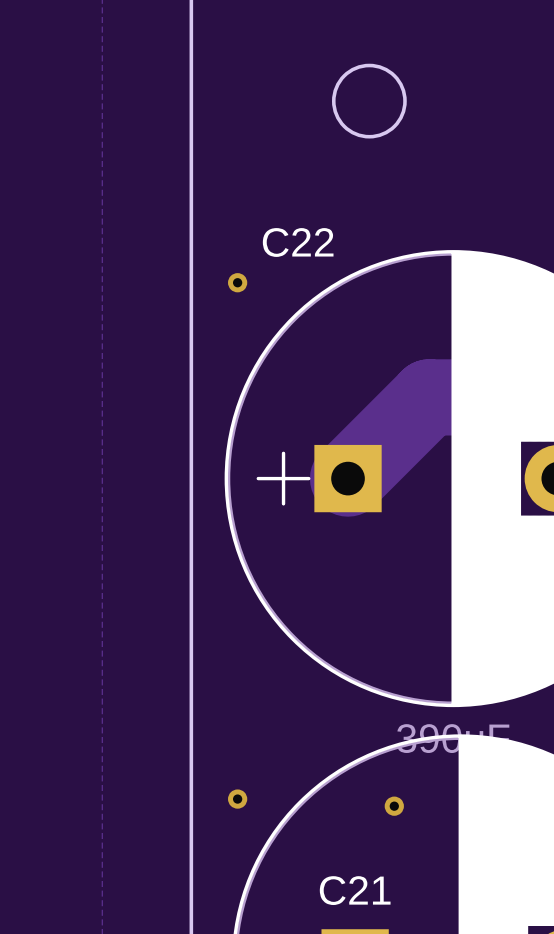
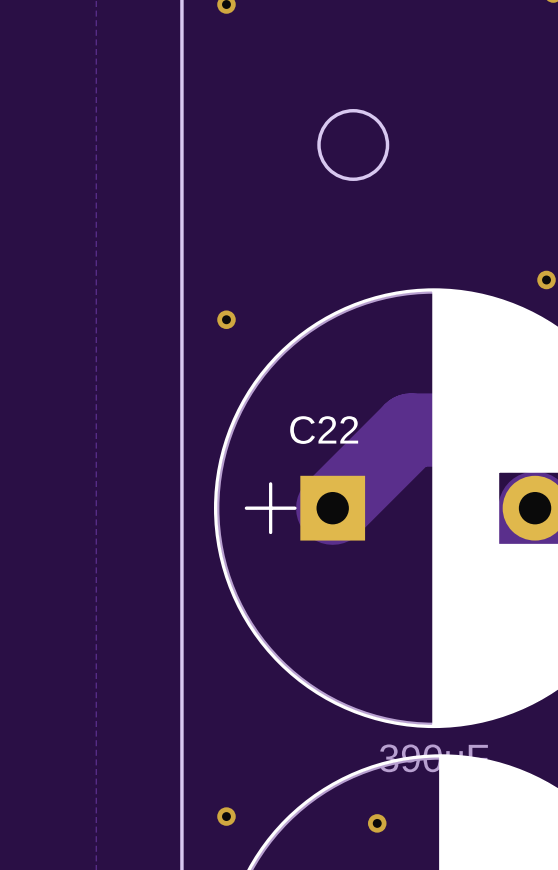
C22 name position: C22 (298, 242) -> C22 (324, 430)

